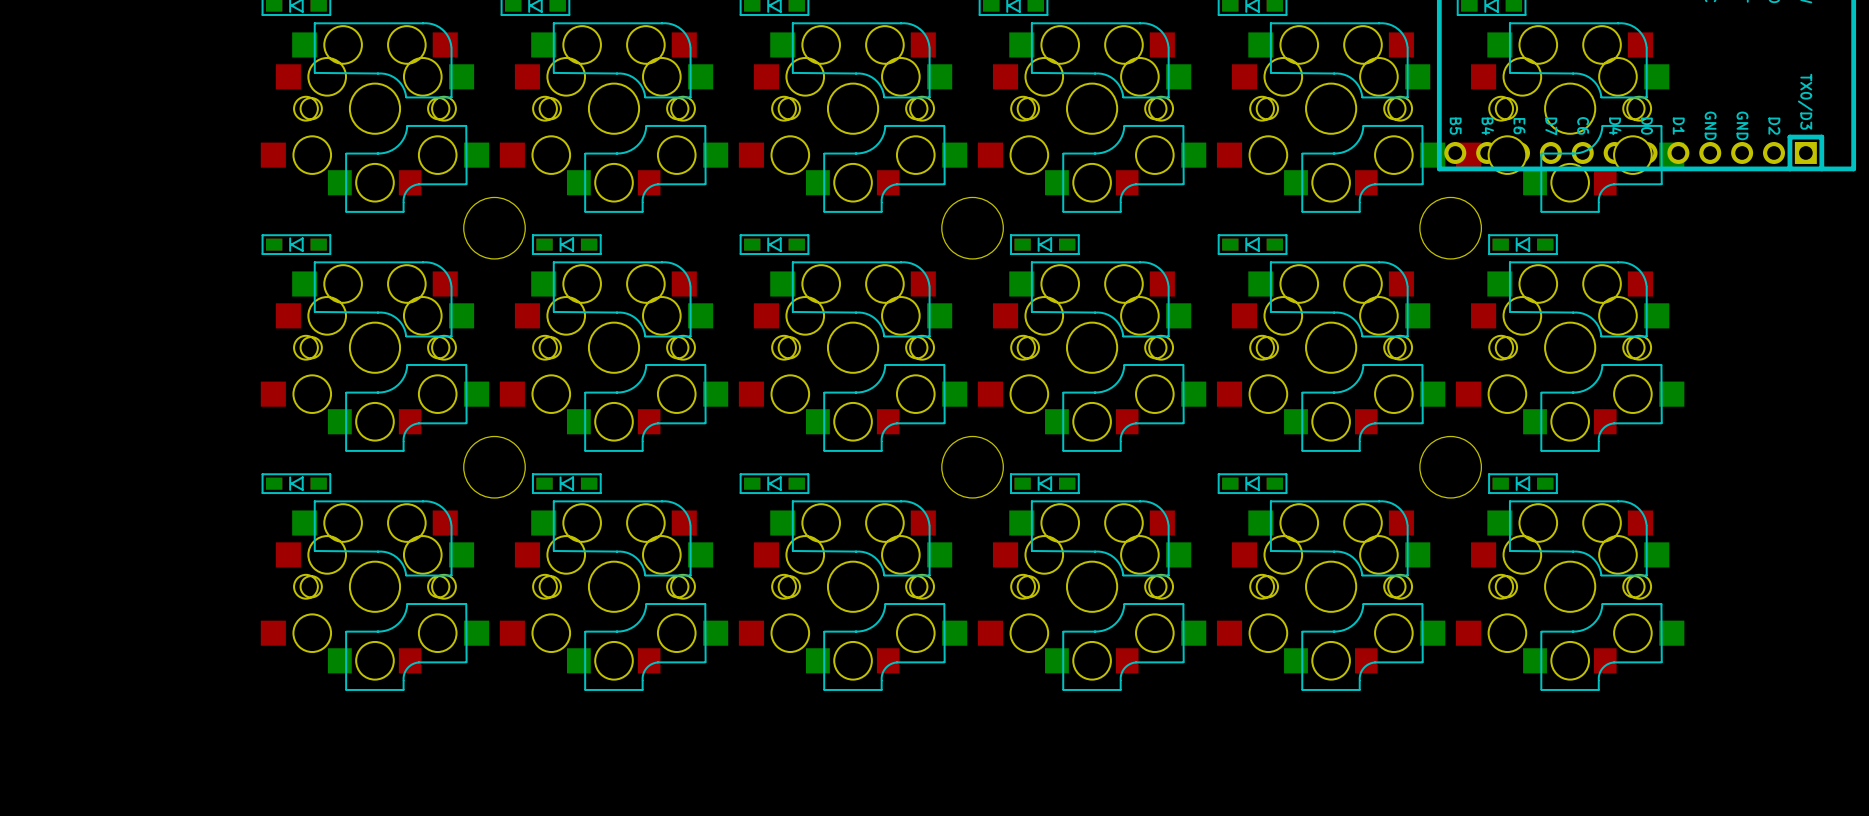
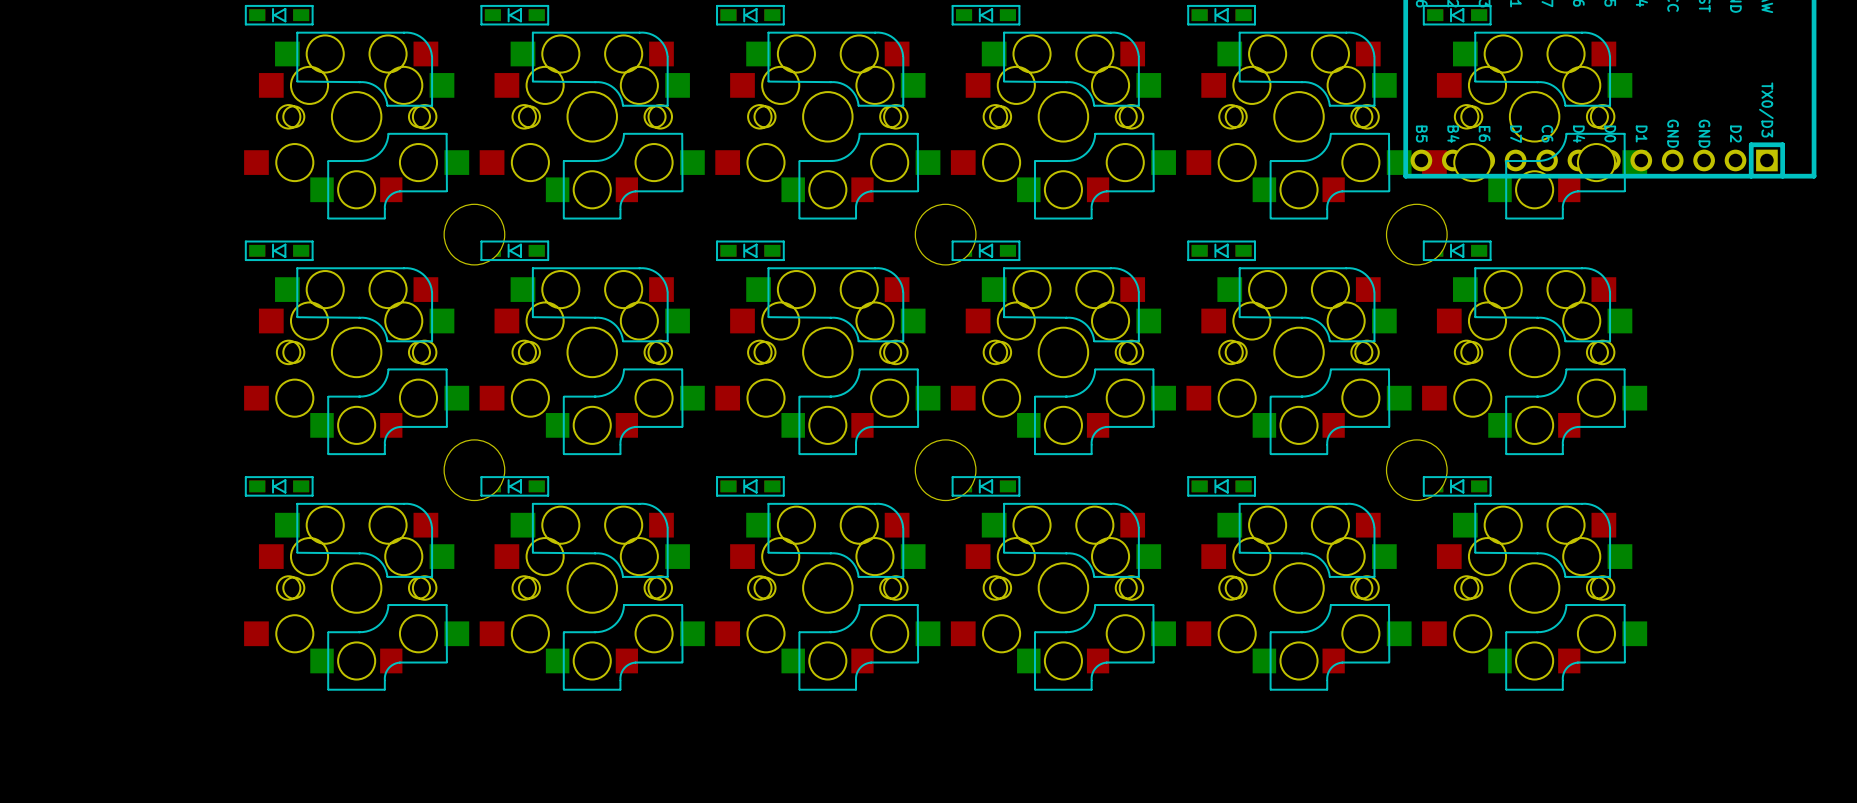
part position: (566, 244) -> (514, 250)
part position: (1044, 244) -> (986, 250)
part position: (1522, 244) -> (1457, 250)
part position: (566, 483) -> (514, 486)
part position: (1044, 483) -> (986, 486)
part position: (1522, 483) -> (1457, 486)

